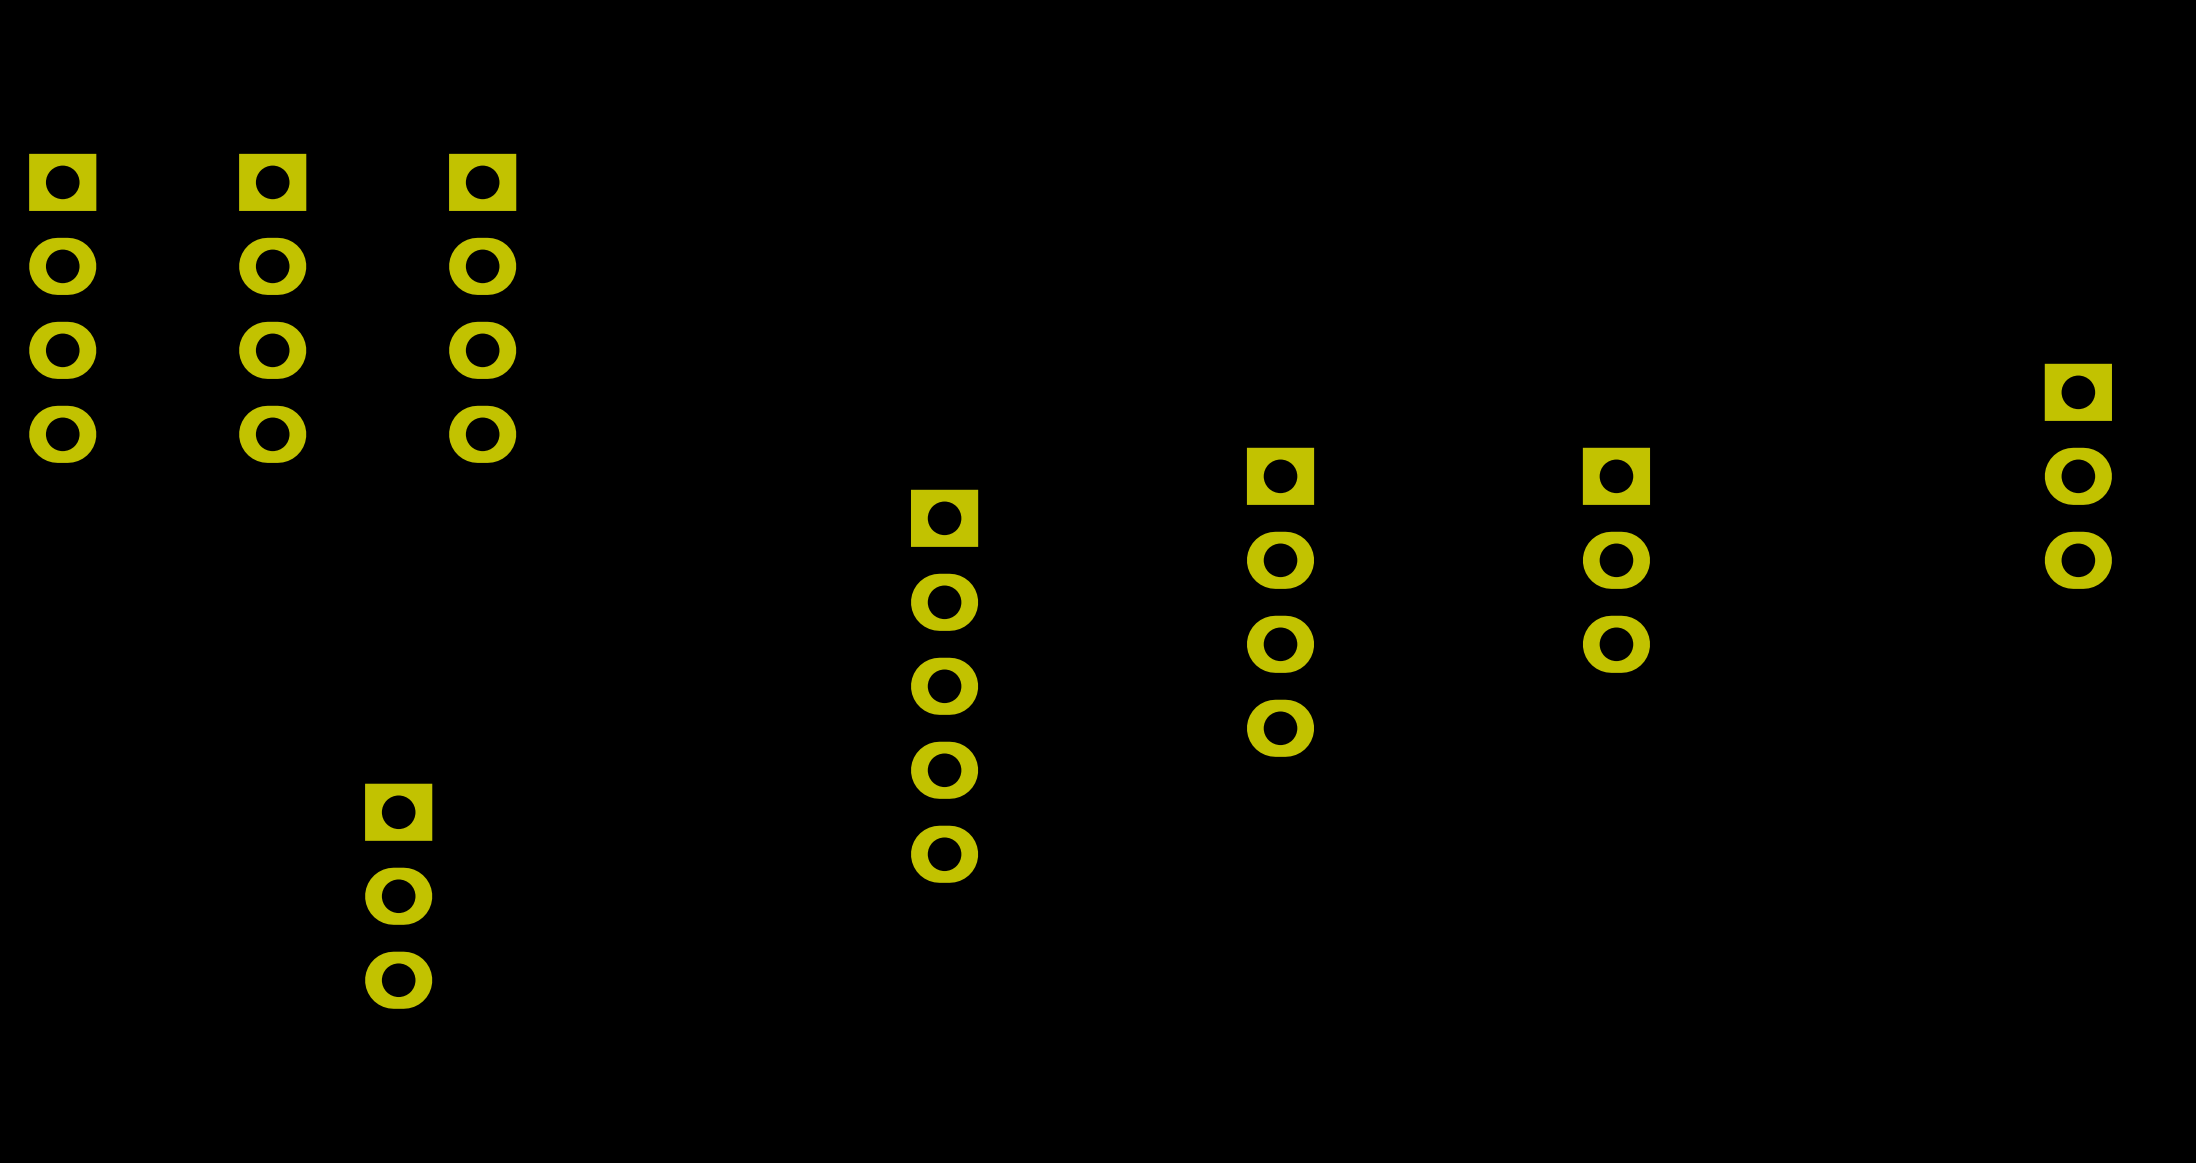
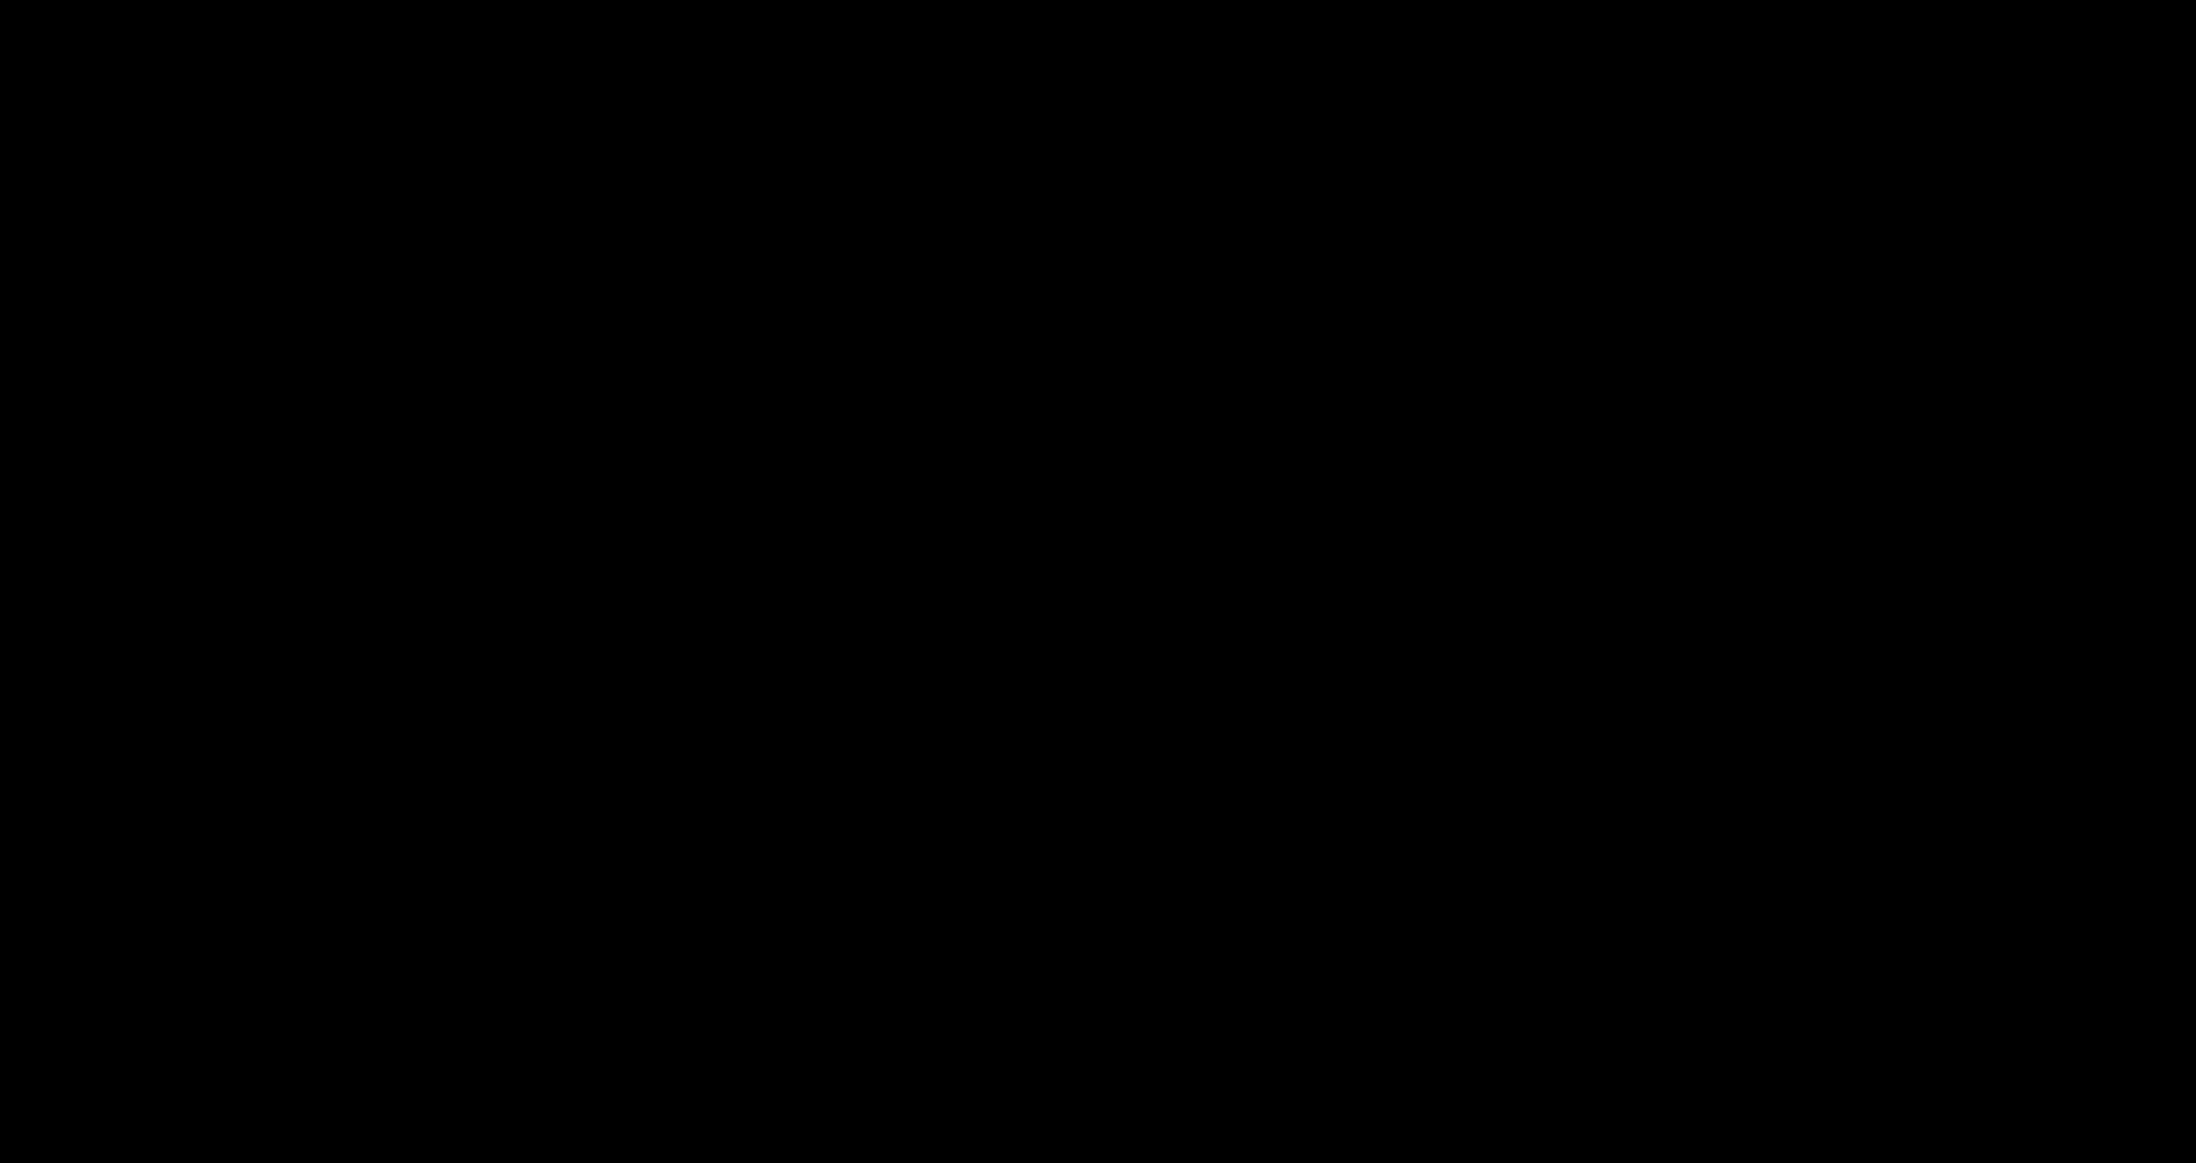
part: (62, 308) -> none
part: (272, 308) -> none
part: (482, 308) -> none
part: (2078, 476) -> none
part: (1616, 560) -> none
part: (1280, 602) -> none
part: (944, 686) -> none
part: (398, 896) -> none

